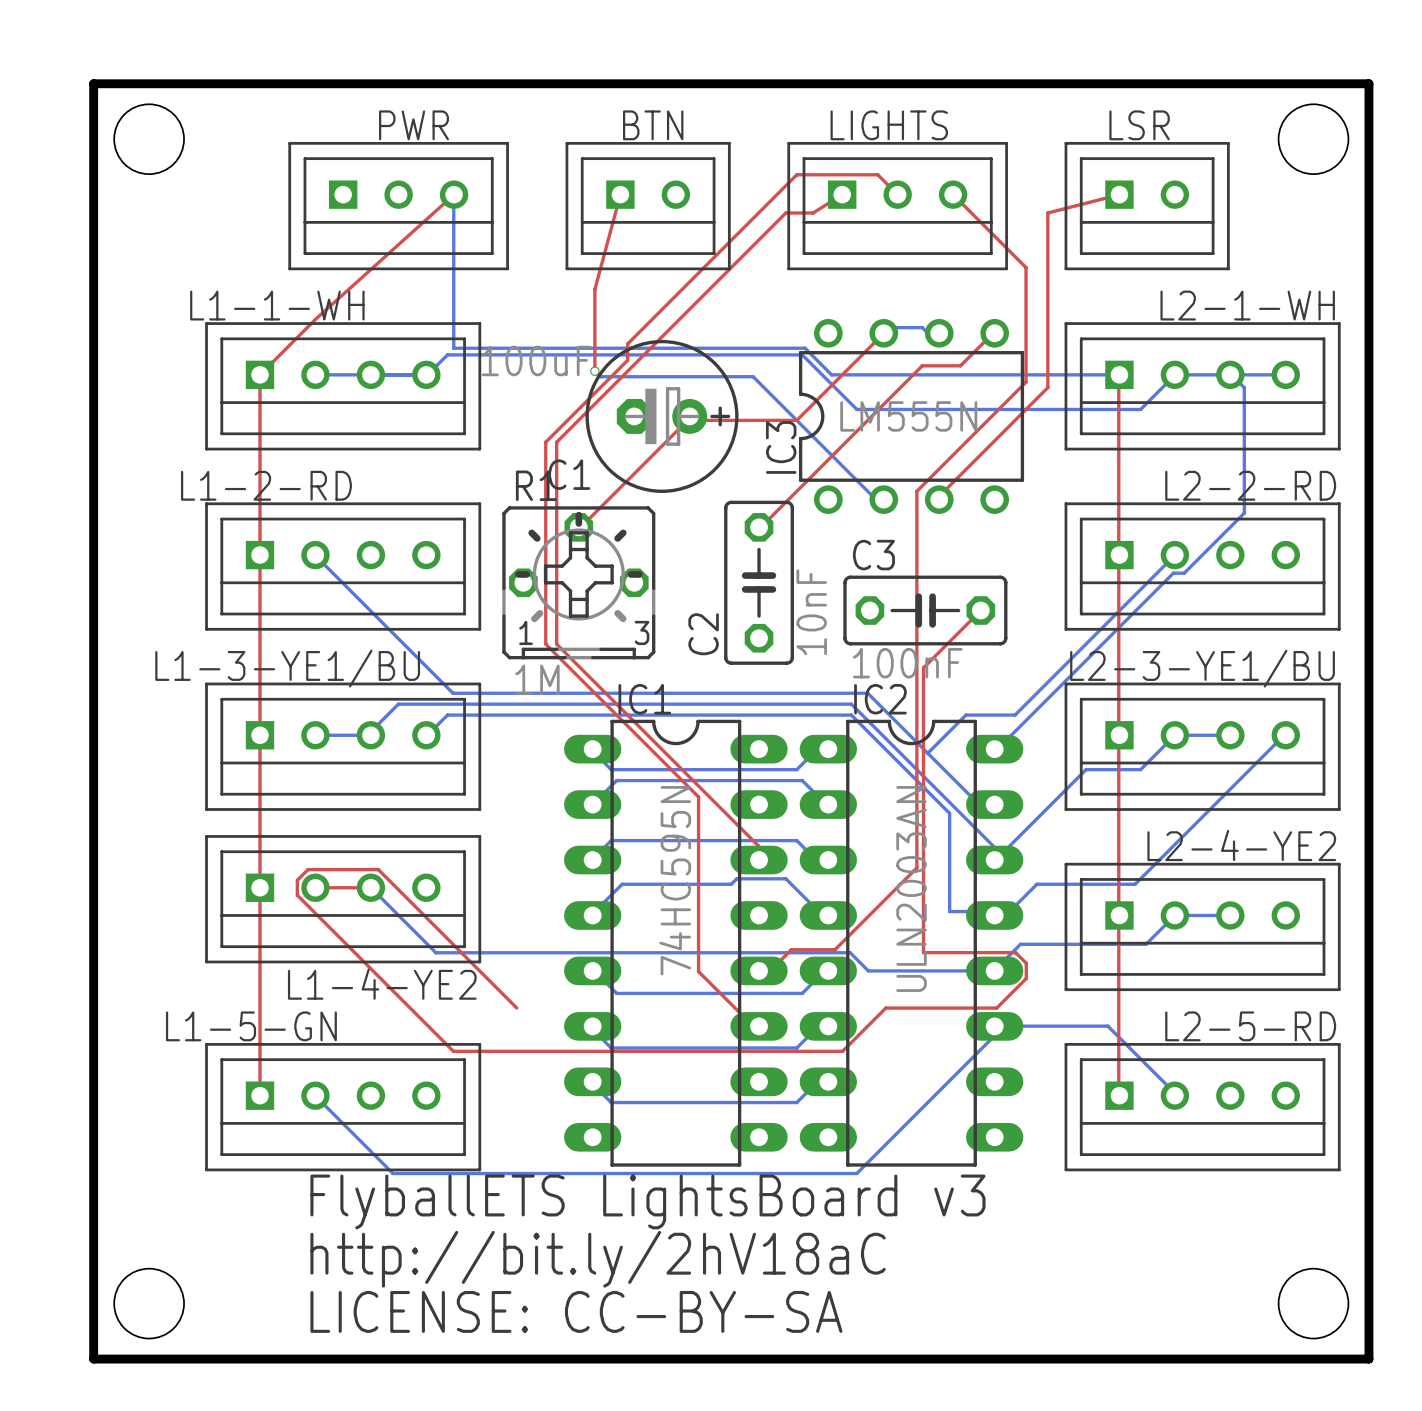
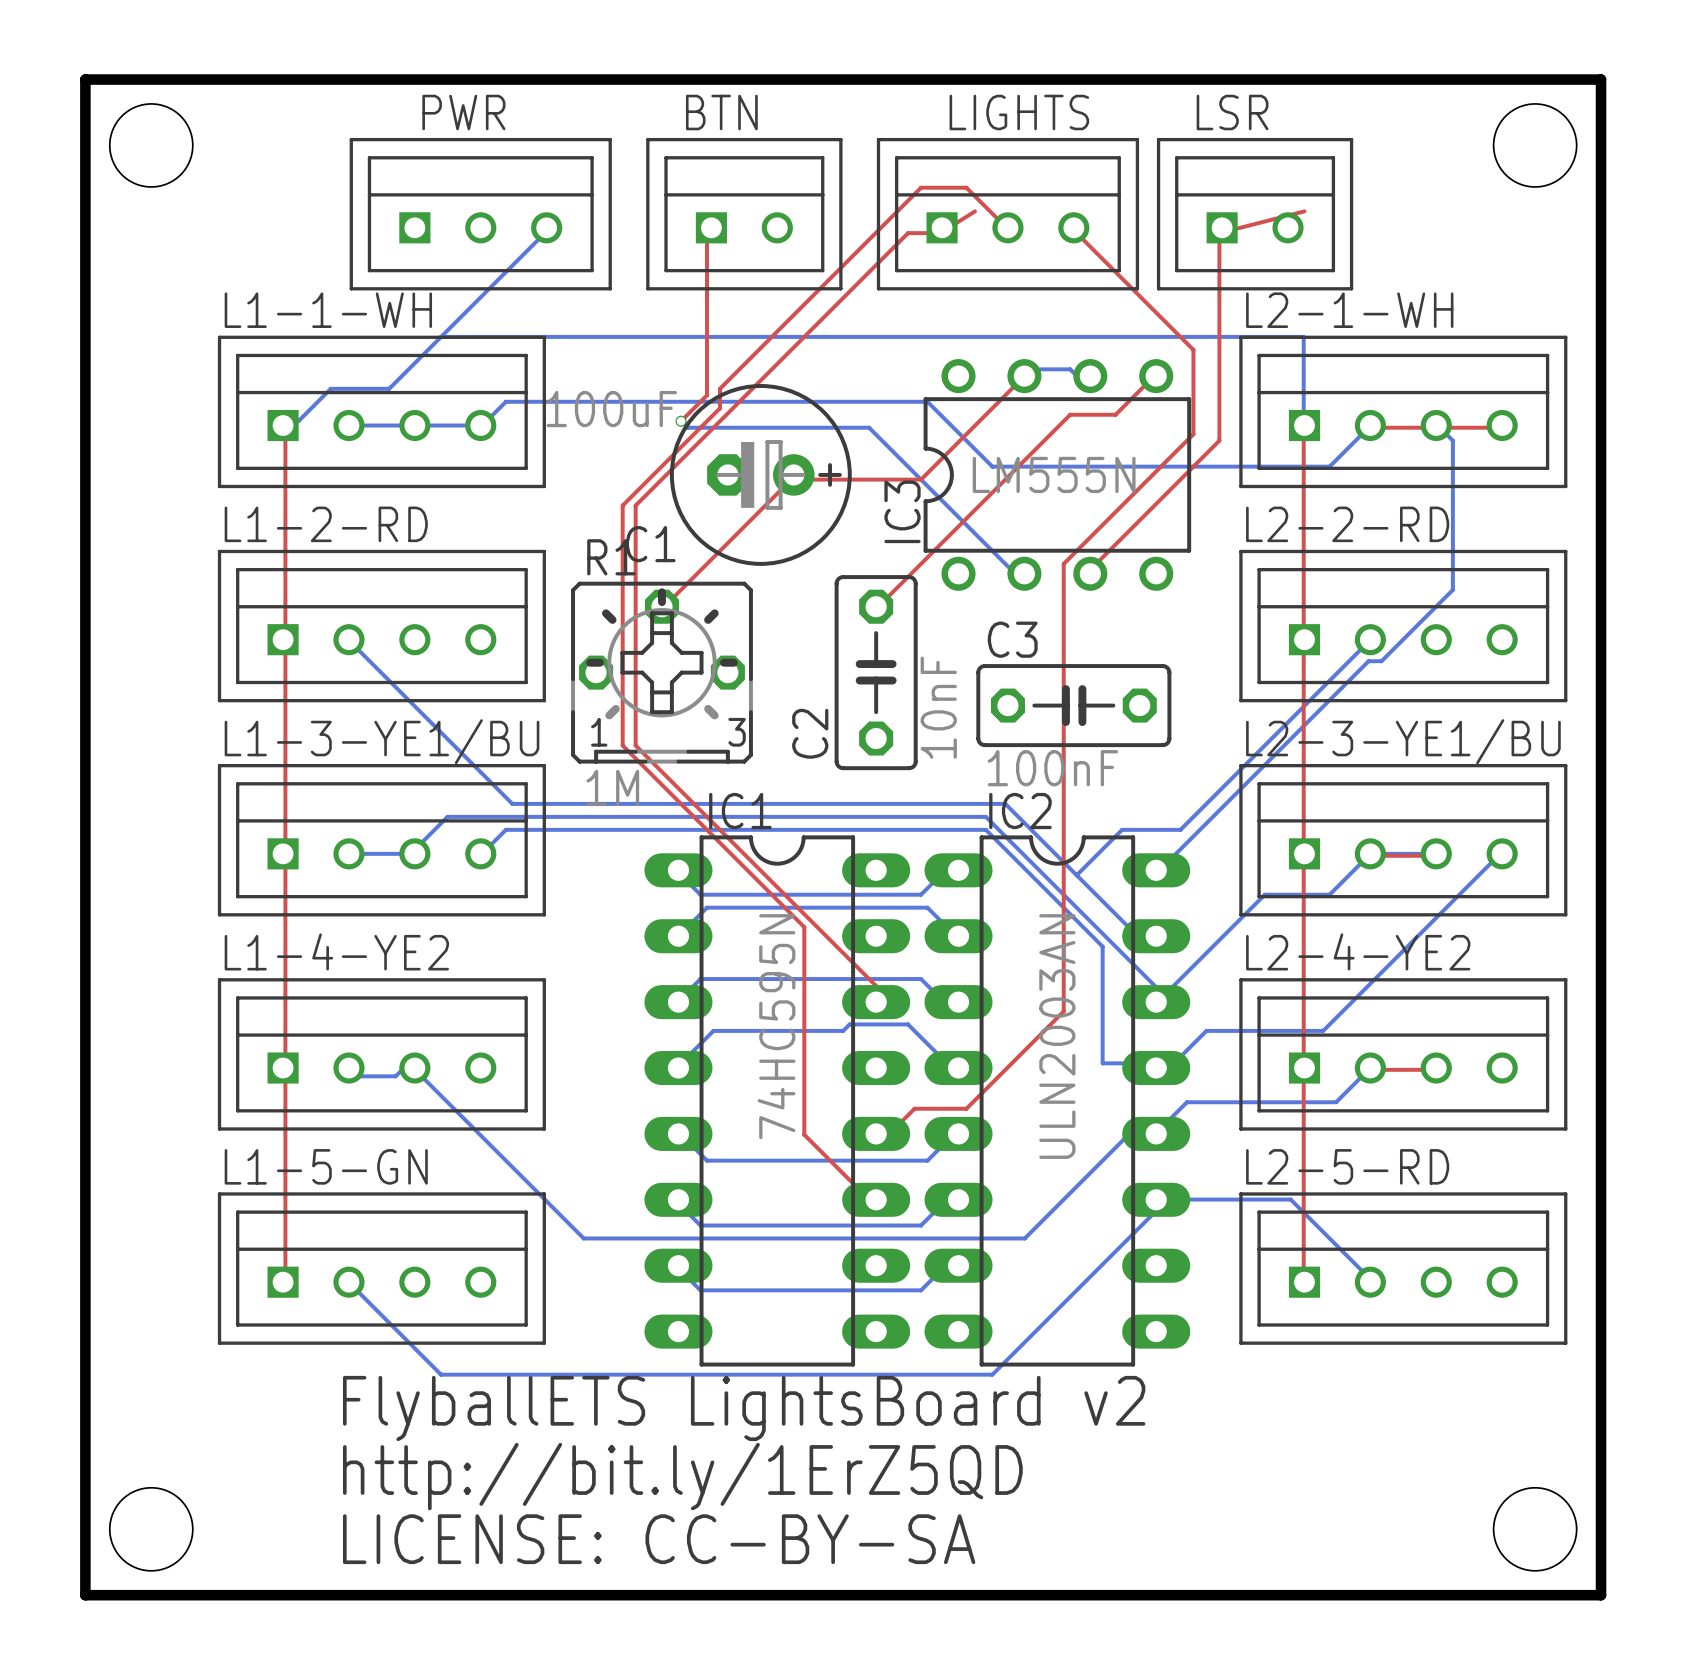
BTN footprint: [565, 141, 731, 271] -> [646, 137, 843, 291]
top track: (835, 174) (877, 174) (897, 194) -> (966, 187) (1007, 227)
bottom track: (453, 194) (453, 348) (805, 348) (831, 374) (1119, 374) -> (441, 336) (1303, 336) (1304, 425)
top track: (454, 194) (315, 319) (260, 374) (260, 1095) -> (283, 425) (285, 427) (285, 635) (283, 639) (285, 641) (285, 849) (283, 853) (285, 855) (285, 1063) (283, 1068) (285, 1069) (285, 1277) (283, 1282)
top track: (620, 194) (594, 289) (594, 371) -> (711, 227) (707, 233) (707, 395) (681, 421)
top track: (953, 194) (1026, 267) (1026, 311) -> (1073, 227) (1076, 233) (1193, 349)
PWR: none -> (480, 214)
LIGHTS: none -> (1007, 214)
LSR: none -> (1255, 214)
PWR: (398, 206) -> none
LIGHTS: (897, 206) -> none
LSR: (1147, 206) -> none
bottom track: none -> (546, 227) (544, 233) (389, 388) (330, 388) (298, 421) (285, 421) (283, 425)
L2-1-WH name position: L2-1-WH (1247, 305) -> L2-1-WH (1349, 310)
L1-1-WH footprint: [205, 322, 482, 451] -> [217, 335, 546, 489]
L2-1-WH footprint: [1064, 322, 1341, 451] -> [1239, 335, 1568, 489]
top track: none -> (1370, 425) (1375, 427) (1433, 427) (1436, 425) (1439, 427) (1498, 427) (1502, 425)
bottom track: (1174, 374) (1285, 374) -> none
L1-2-RD name position: L1-2-RD (266, 485) -> L1-2-RD (326, 524)
L2-2-RD name position: L2-2-RD (1250, 485) -> L2-2-RD (1347, 524)
L1-2-RD footprint: [205, 502, 482, 631] -> [217, 549, 546, 703]
L2-2-RD footprint: [1064, 502, 1341, 631] -> [1239, 549, 1568, 703]
top track: (980, 610) (923, 667) (923, 952) (1015, 952) (1026, 963) (1026, 978) (996, 1008) (885, 1008) (842, 1051) (453, 1051) (297, 895) (297, 880) (307, 869) (378, 869) (516, 1008) -> none
L1-3-YE1/BU name position: L1-3-YE1/BU (287, 668) -> L1-3-YE1/BU (382, 741)
L1-3-YE1/BU footprint: [205, 682, 482, 811] -> [217, 763, 546, 917]
L2-3-YE1/BU footprint: [1064, 682, 1341, 811] -> [1239, 763, 1568, 917]
top track: none -> (1370, 853) (1375, 855) (1433, 855) (1436, 853)
L1-4-YE2 footprint: [205, 835, 482, 964] -> [217, 978, 546, 1131]
L2-4-YE2 name position: L2-4-YE2 (1241, 845) -> L2-4-YE2 (1358, 951)
L2-4-YE2 footprint: [1064, 862, 1341, 992] -> [1239, 978, 1568, 1131]
top track: (315, 887) (370, 887) -> none
bottom track: (370, 887) (435, 952) (850, 952) (868, 970) (994, 970) -> (348, 1068) (356, 1076) (395, 1076) (402, 1069) (414, 1068) (583, 1238) (1024, 1238) (1128, 1134) (1156, 1133)
top track: none -> (1370, 1068) (1375, 1069) (1433, 1069) (1436, 1068)
bottom track: (1174, 915) (1230, 915) -> none
L1-4-YE2 name position: L1-4-YE2 (382, 984) -> L1-4-YE2 (336, 951)
L1-5-GN name position: L1-5-GN (251, 1026) -> L1-5-GN (326, 1166)
L2-5-RD name position: L2-5-RD (1250, 1026) -> L2-5-RD (1347, 1166)
L1-5-GN footprint: [205, 1043, 482, 1172] -> [217, 1192, 546, 1345]
L2-5-RD footprint: [1064, 1043, 1341, 1172] -> [1239, 1192, 1568, 1345]
text: FlyballETS LightsBoard v3 (647, 1201) -> FlyballETS LightsBoard v2 (744, 1408)
text: http://bit.ly/2hV18aC (598, 1259) -> http://bit.ly/1ErZ5QD (682, 1476)

